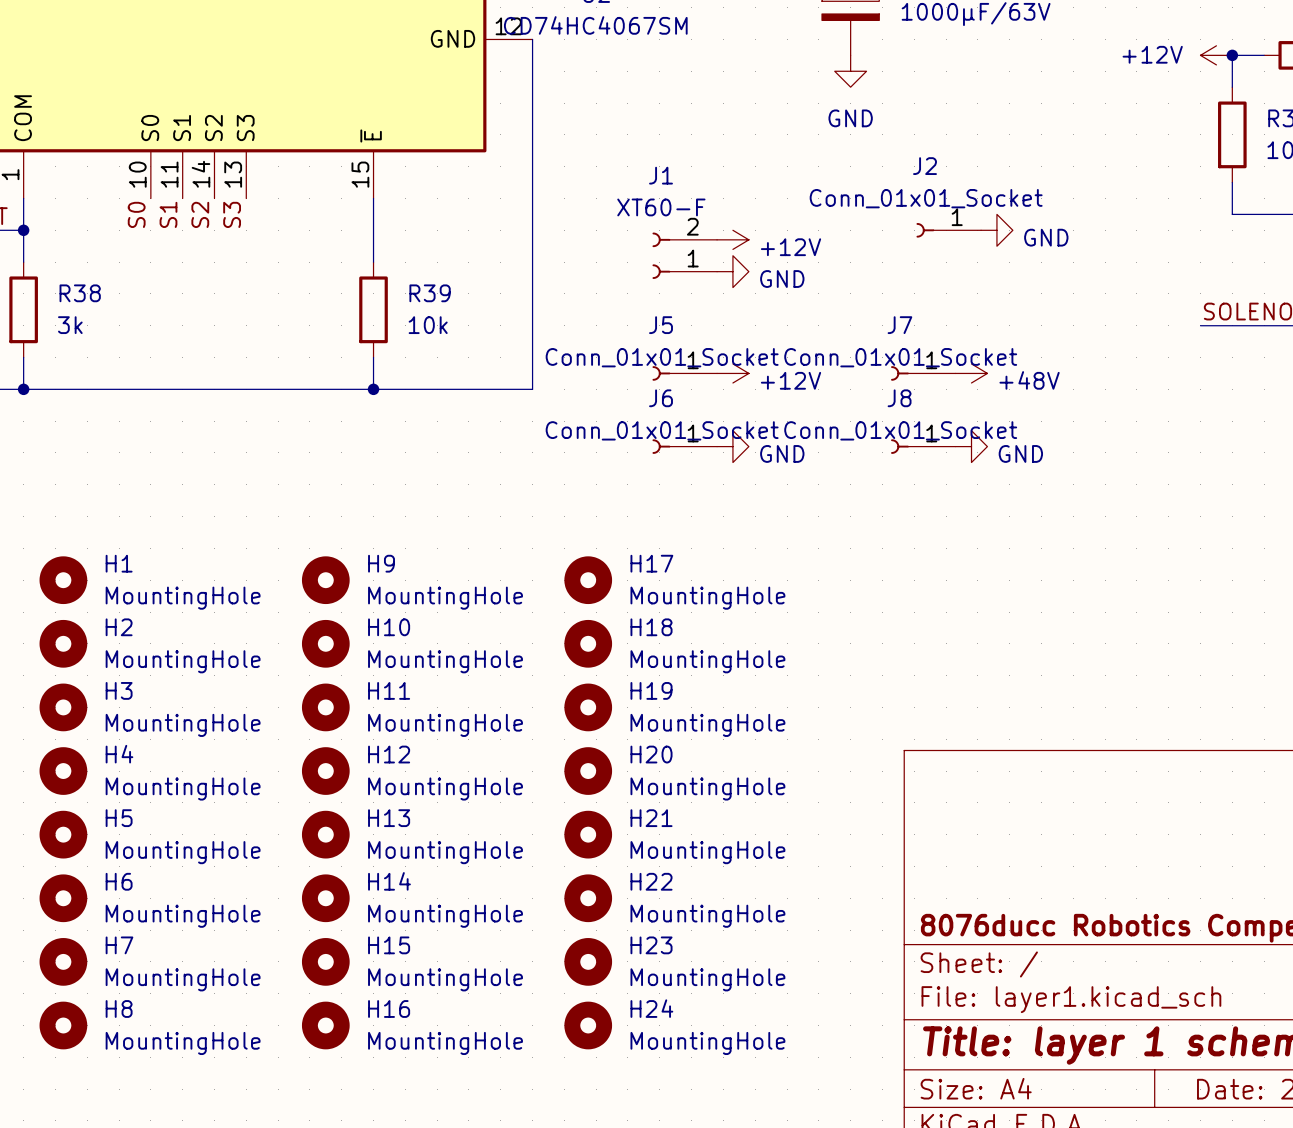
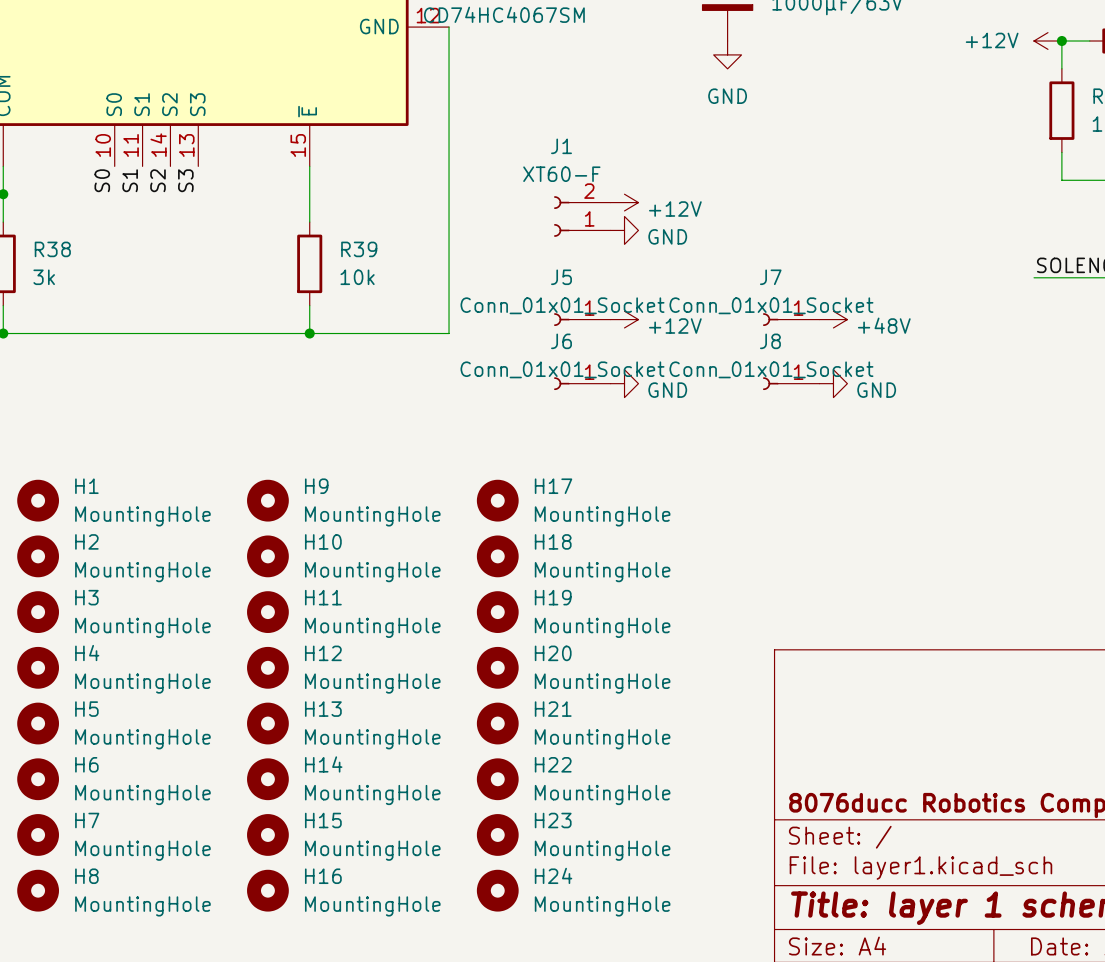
J2: Conn_01x01_Socket (948, 230) -> none
power symbol: GND (996, 230) -> none

